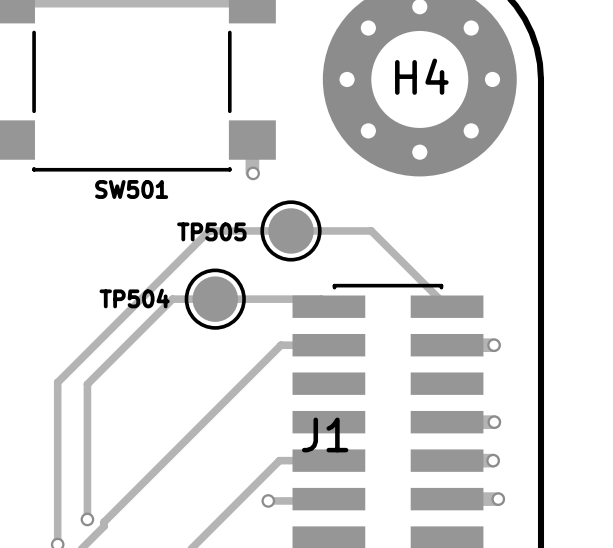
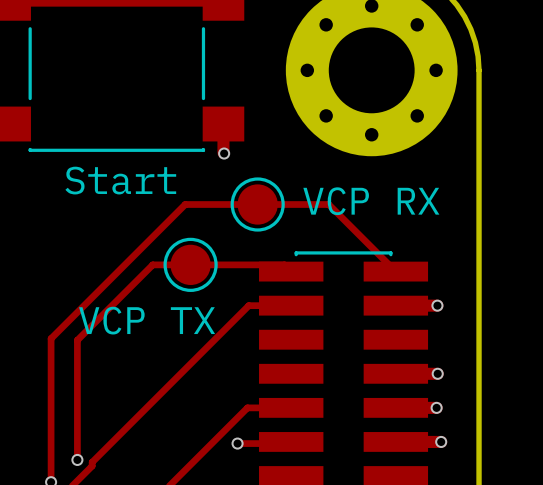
H4 name: H4 (421, 76) -> none
SW501 name: SW501 (131, 189) -> none
text: none -> Start (120, 180)
text: none -> VCP RX (371, 201)
TP505 name: TP505 (211, 231) -> none
TP504 name: TP504 (134, 298) -> none
text: none -> VCP TX (147, 320)
J1 name: J1 (325, 434) -> none

